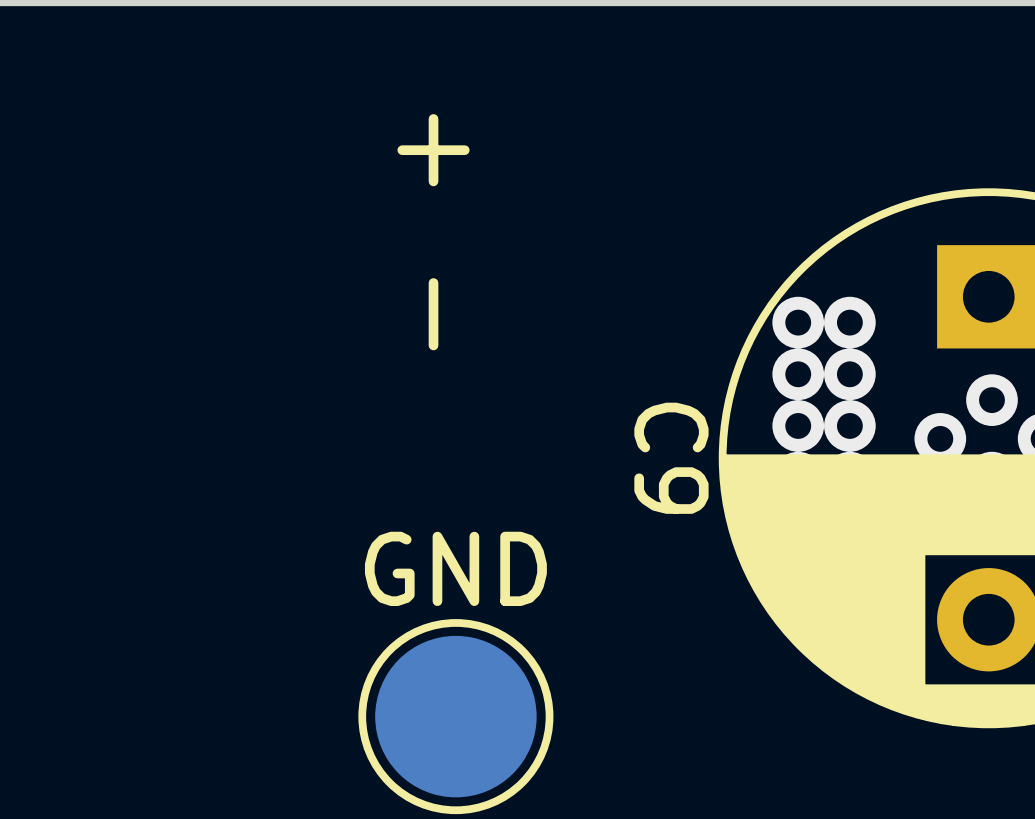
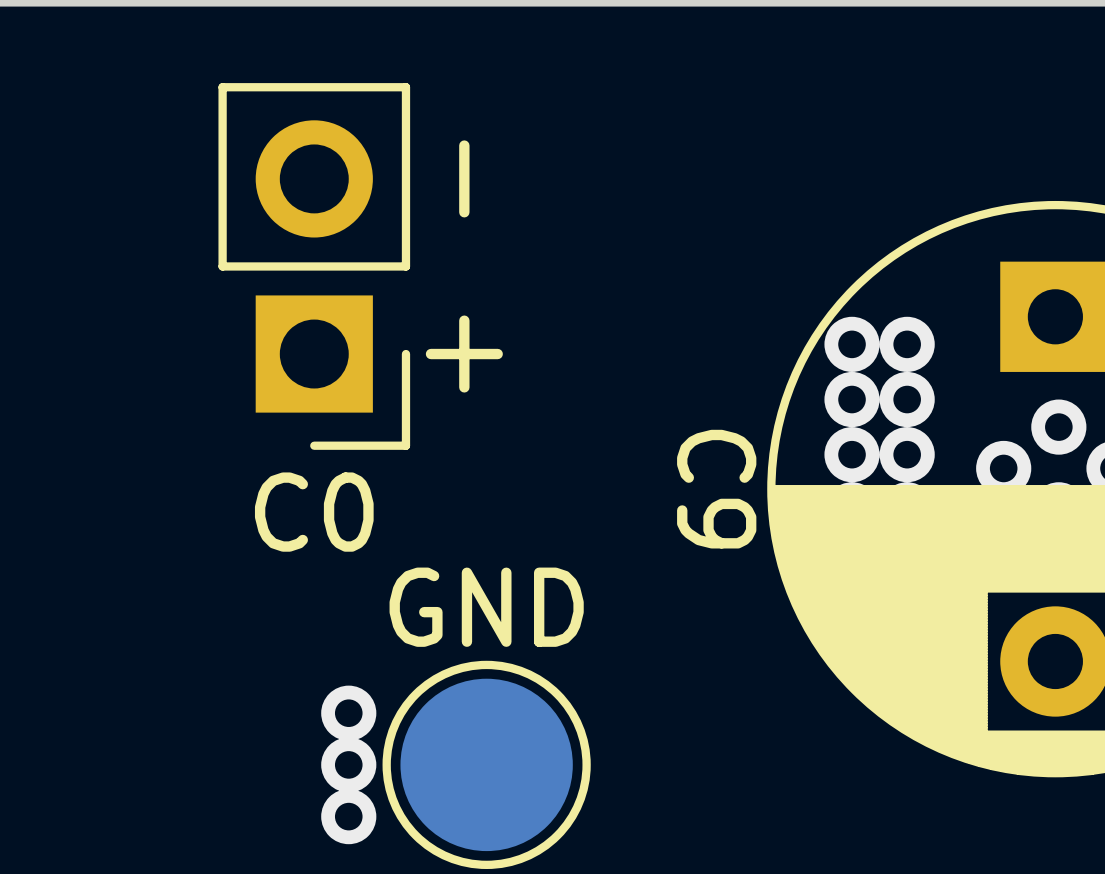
text rotation: 0° (433, 232) -> 180° (464, 266)
C0: none -> (314, 266)
via: none -> (348, 713)
via: none -> (348, 764)
via: none -> (348, 816)

